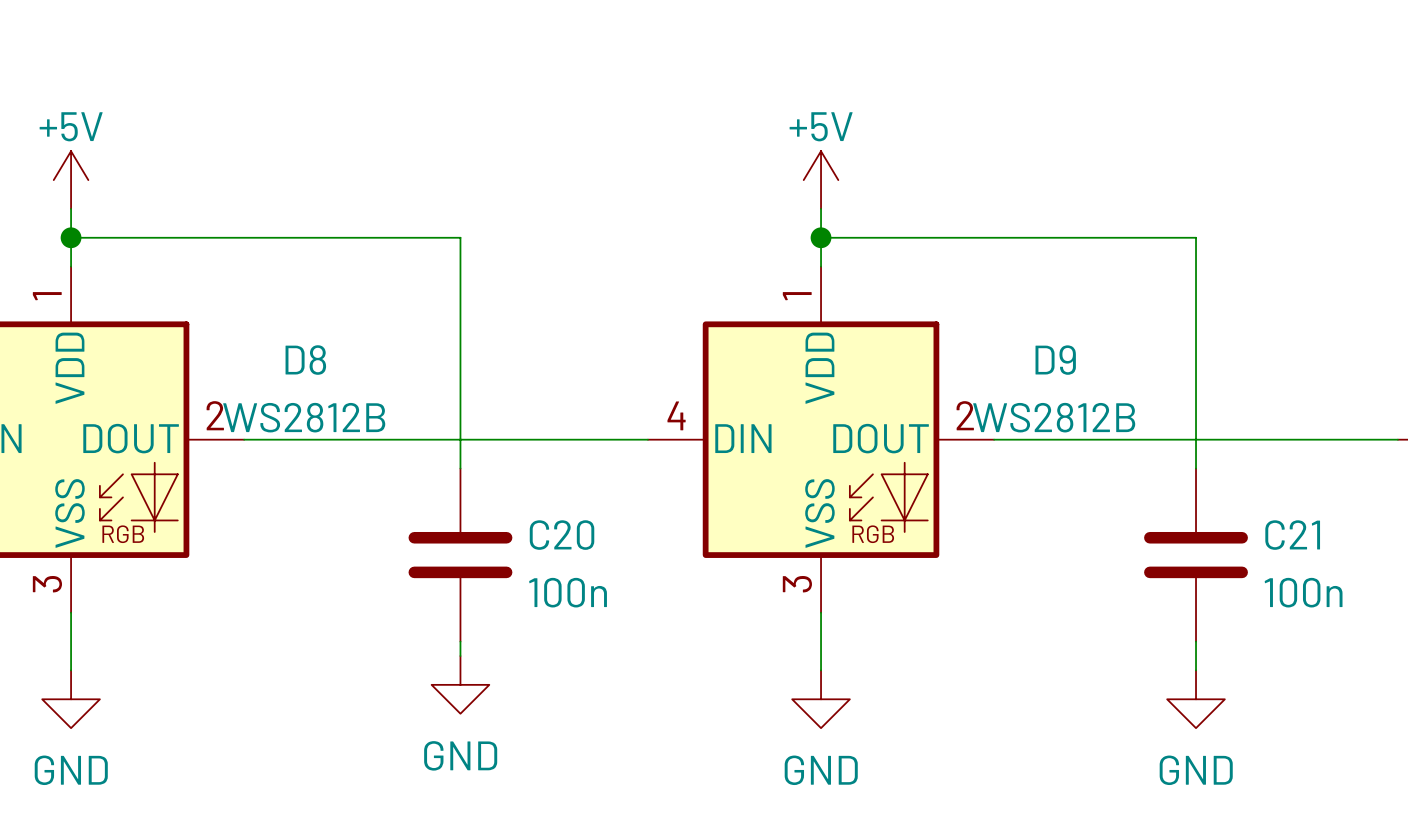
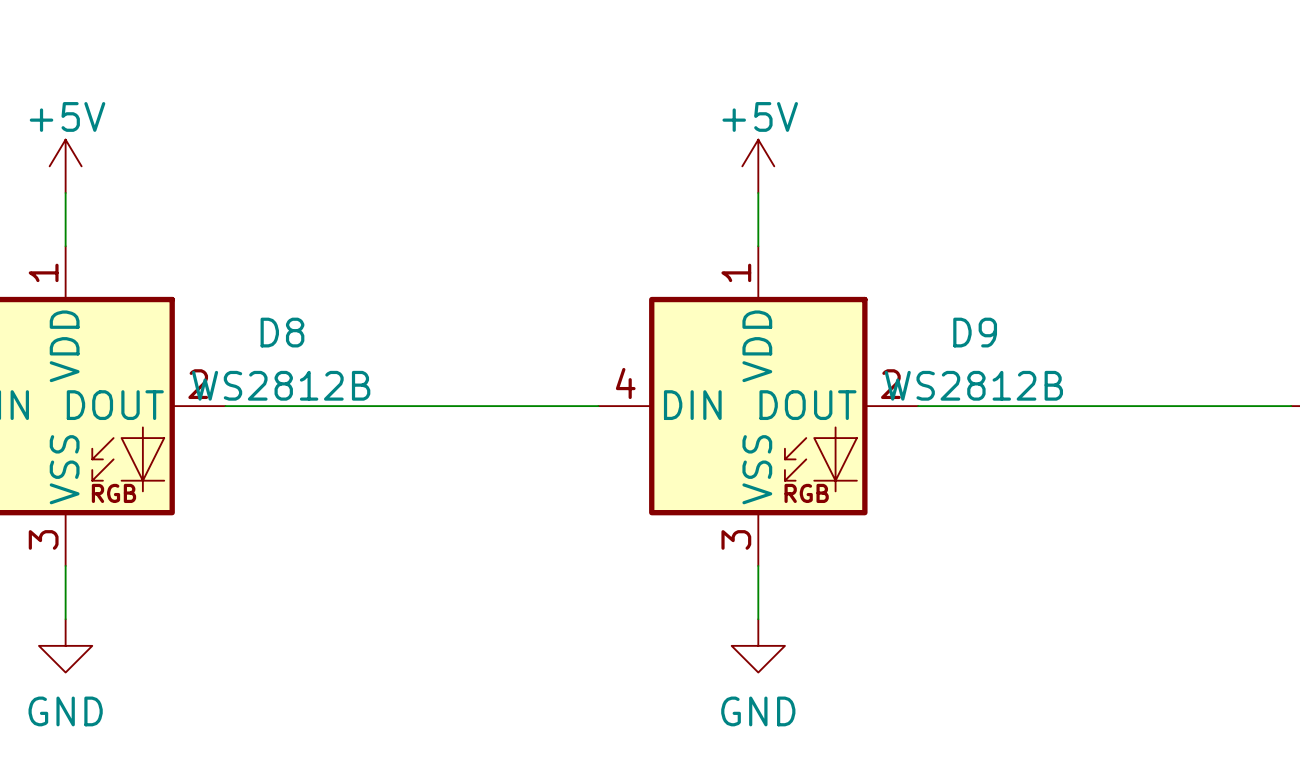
wire: (71, 237) (460, 237) (460, 468) -> none
junction: (71, 237) -> none
wire: (821, 237) (1196, 237) (1196, 468) -> none
junction: (821, 237) -> none
C20: 100n (460, 555) -> none
C21: 100n (1196, 555) -> none
wire: (460, 641) (460, 656) -> none
wire: (1196, 641) (1196, 670) -> none
power symbol: GND (460, 684) -> none
power symbol: GND (1196, 699) -> none

